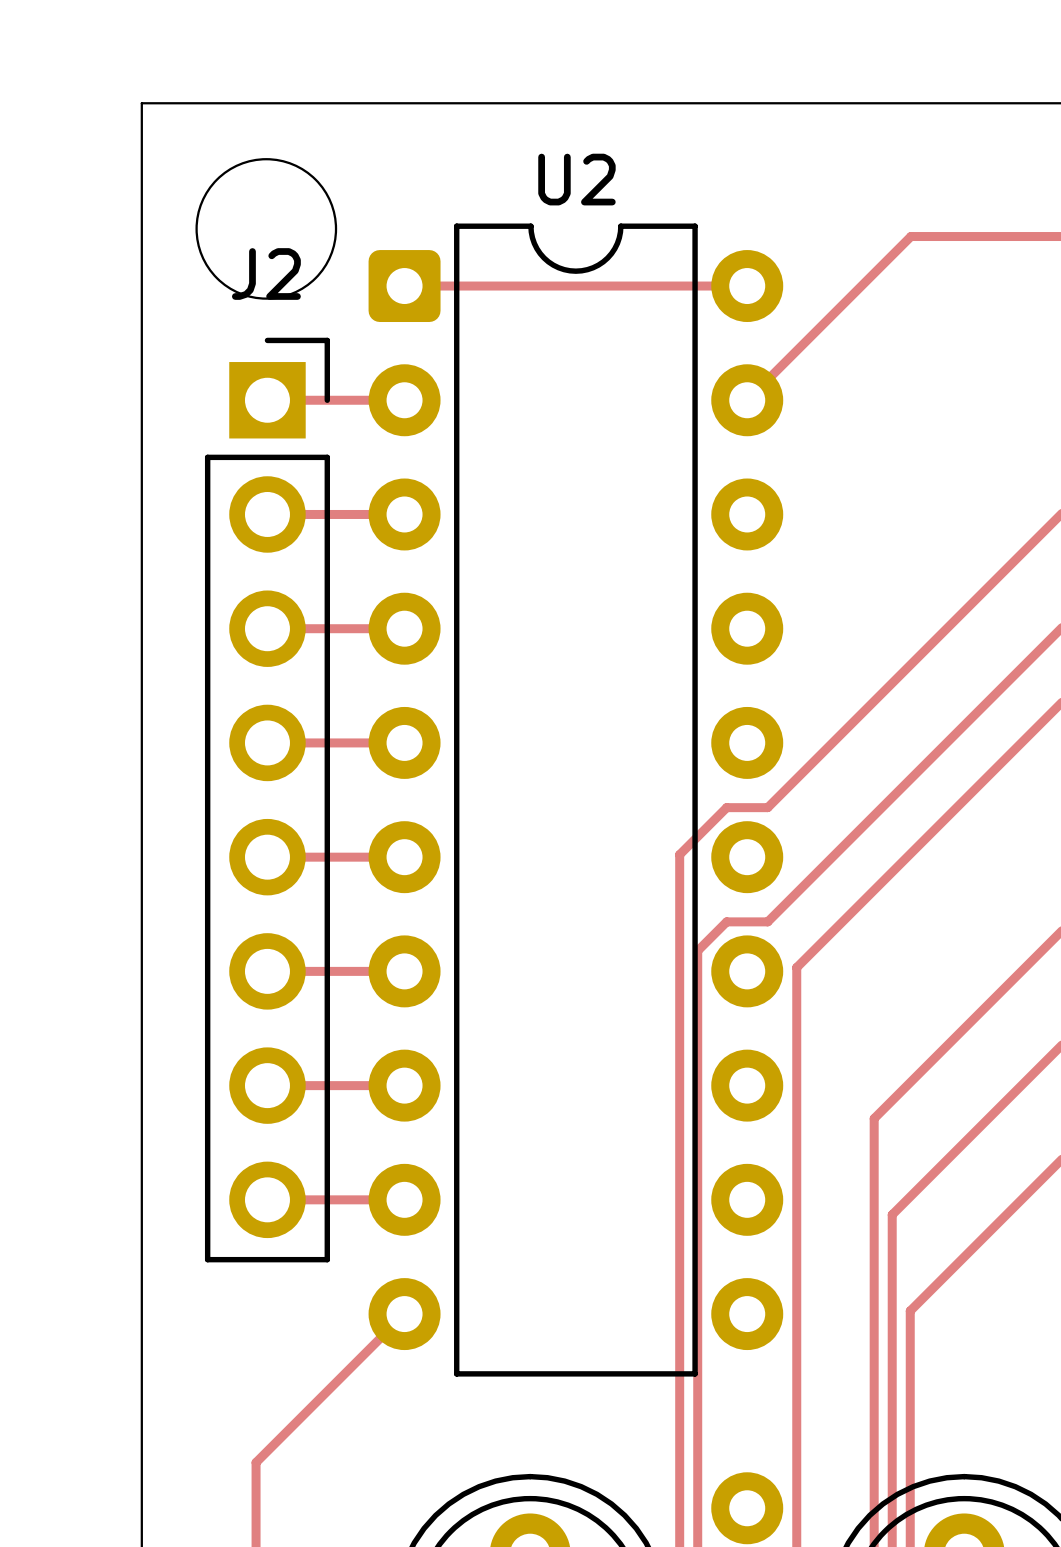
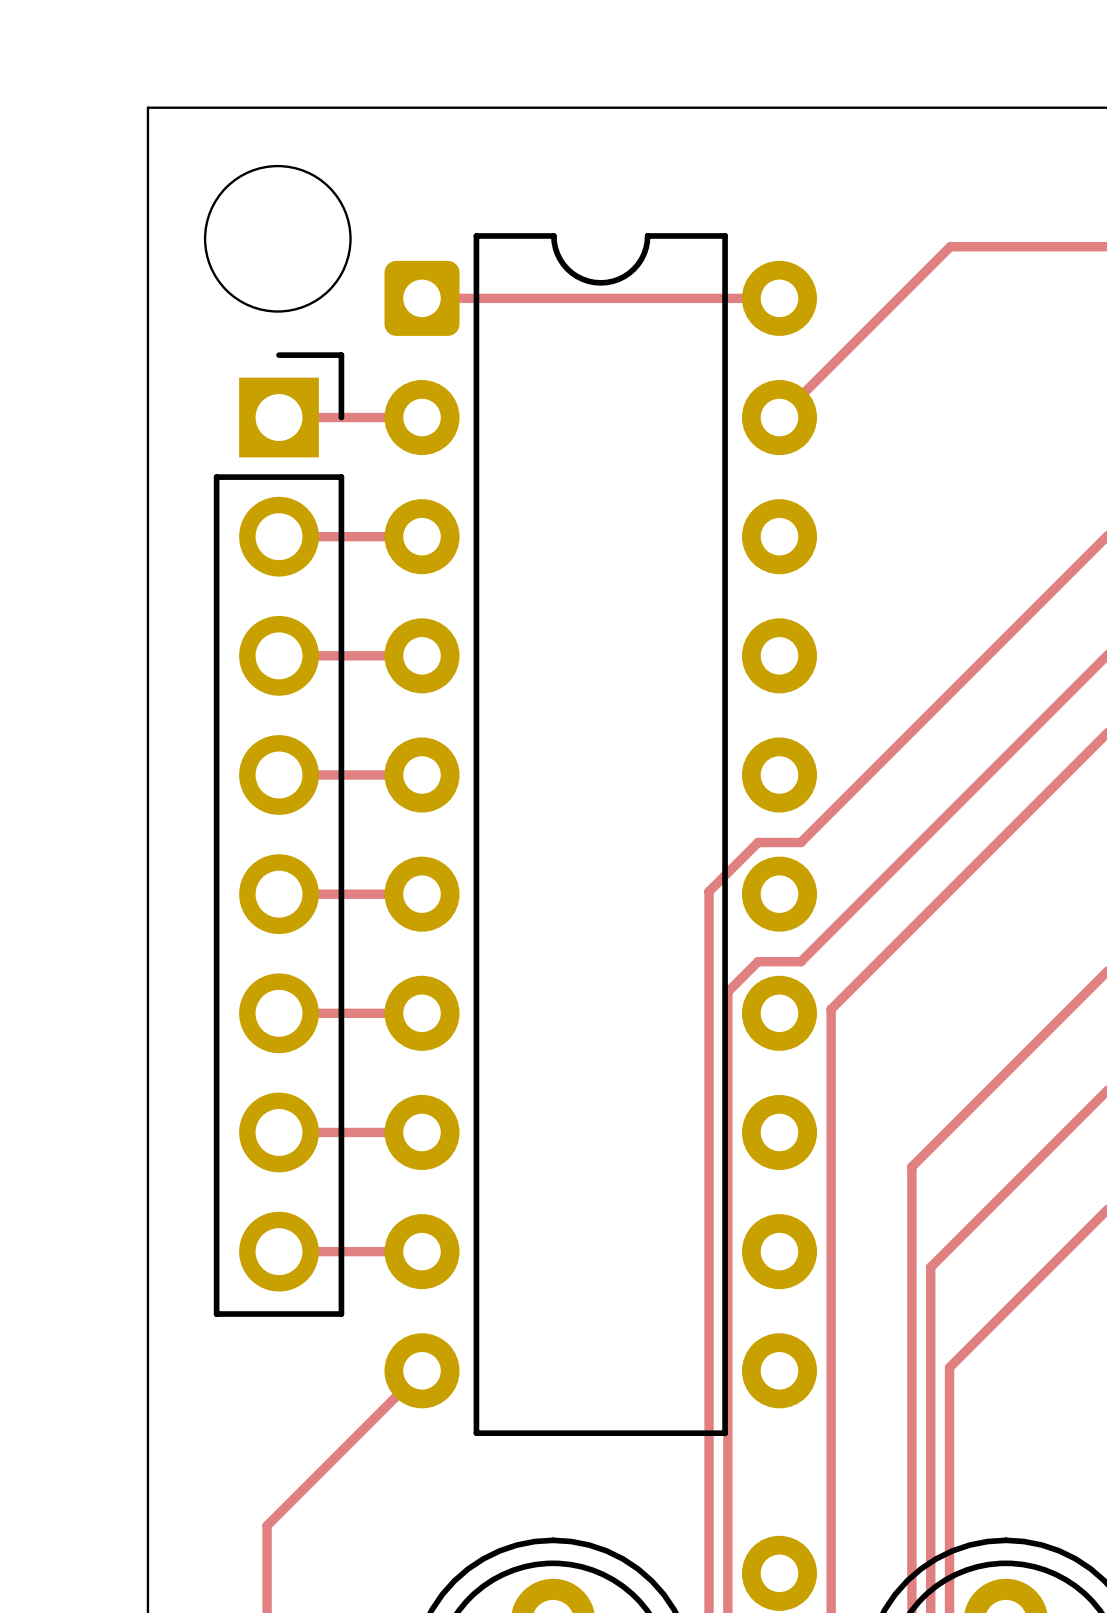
U2 name: U2 (576, 179) -> none
J2 name: J2 (266, 274) -> none

